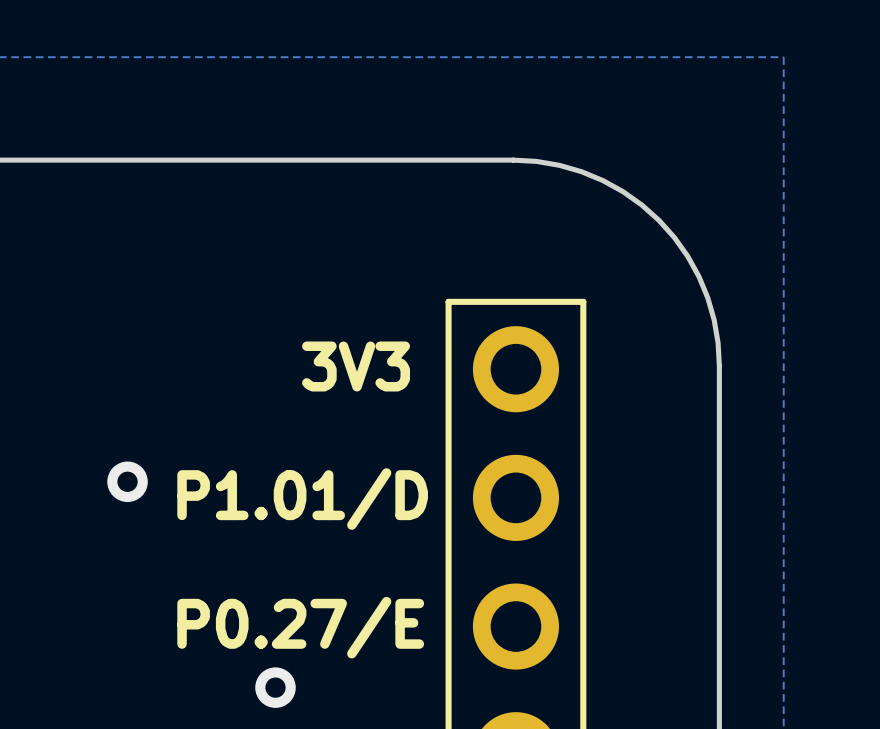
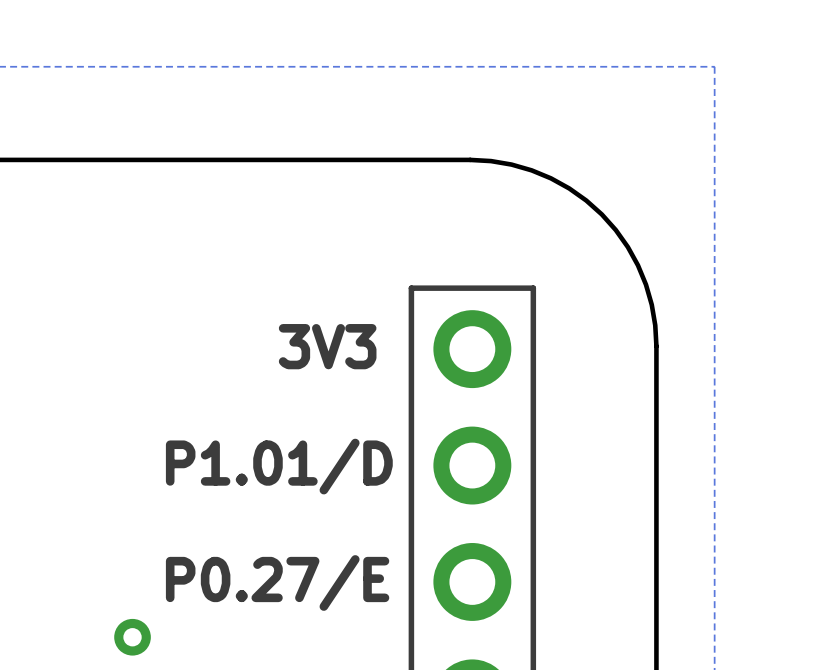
via: (127, 481) -> none
via: none -> (132, 637)
via: (275, 687) -> none

